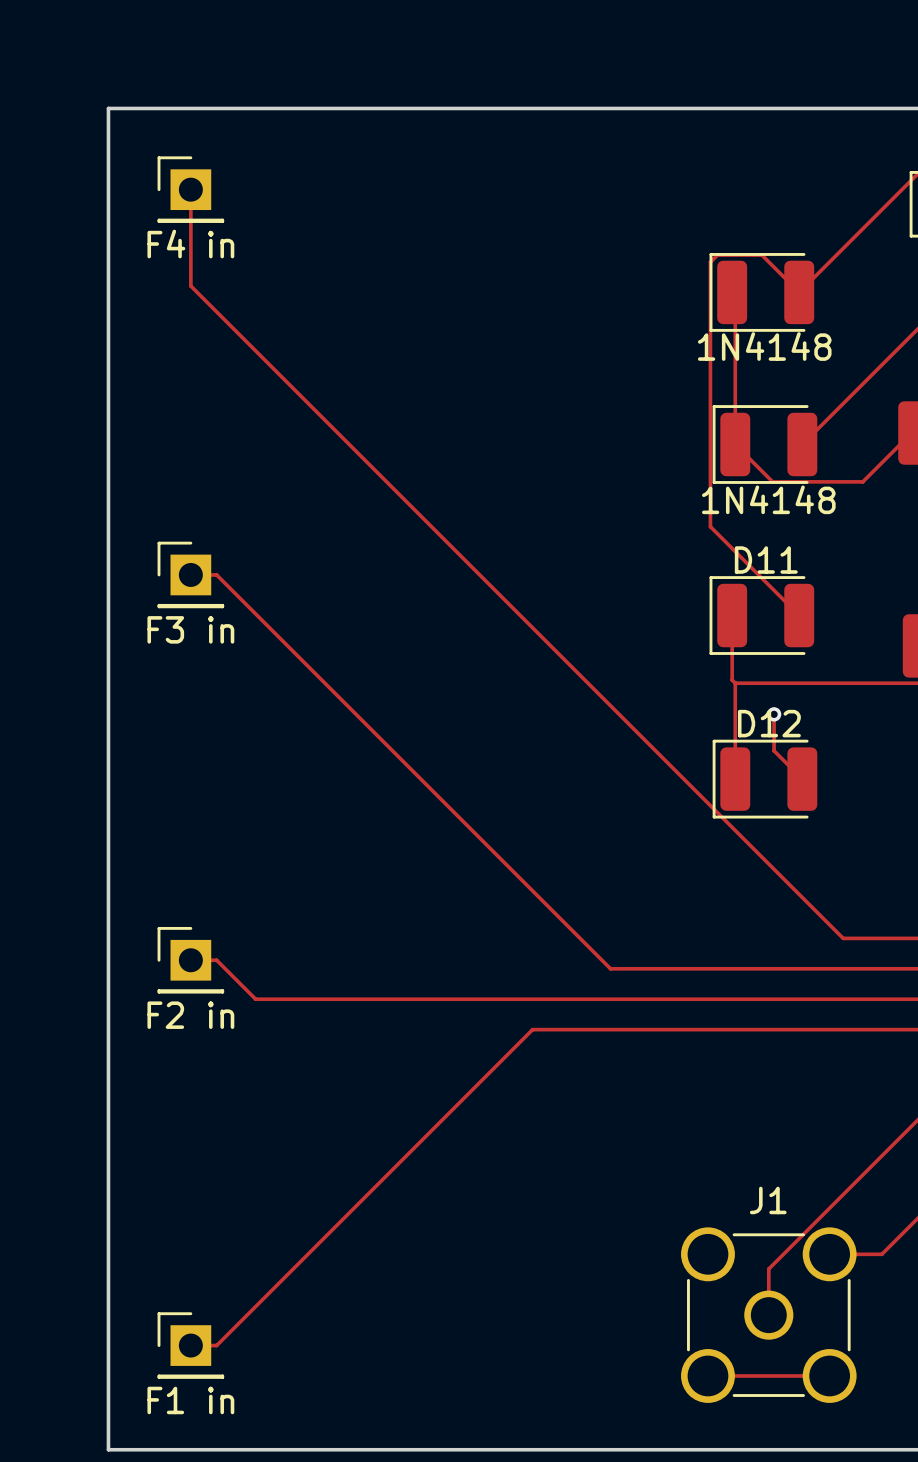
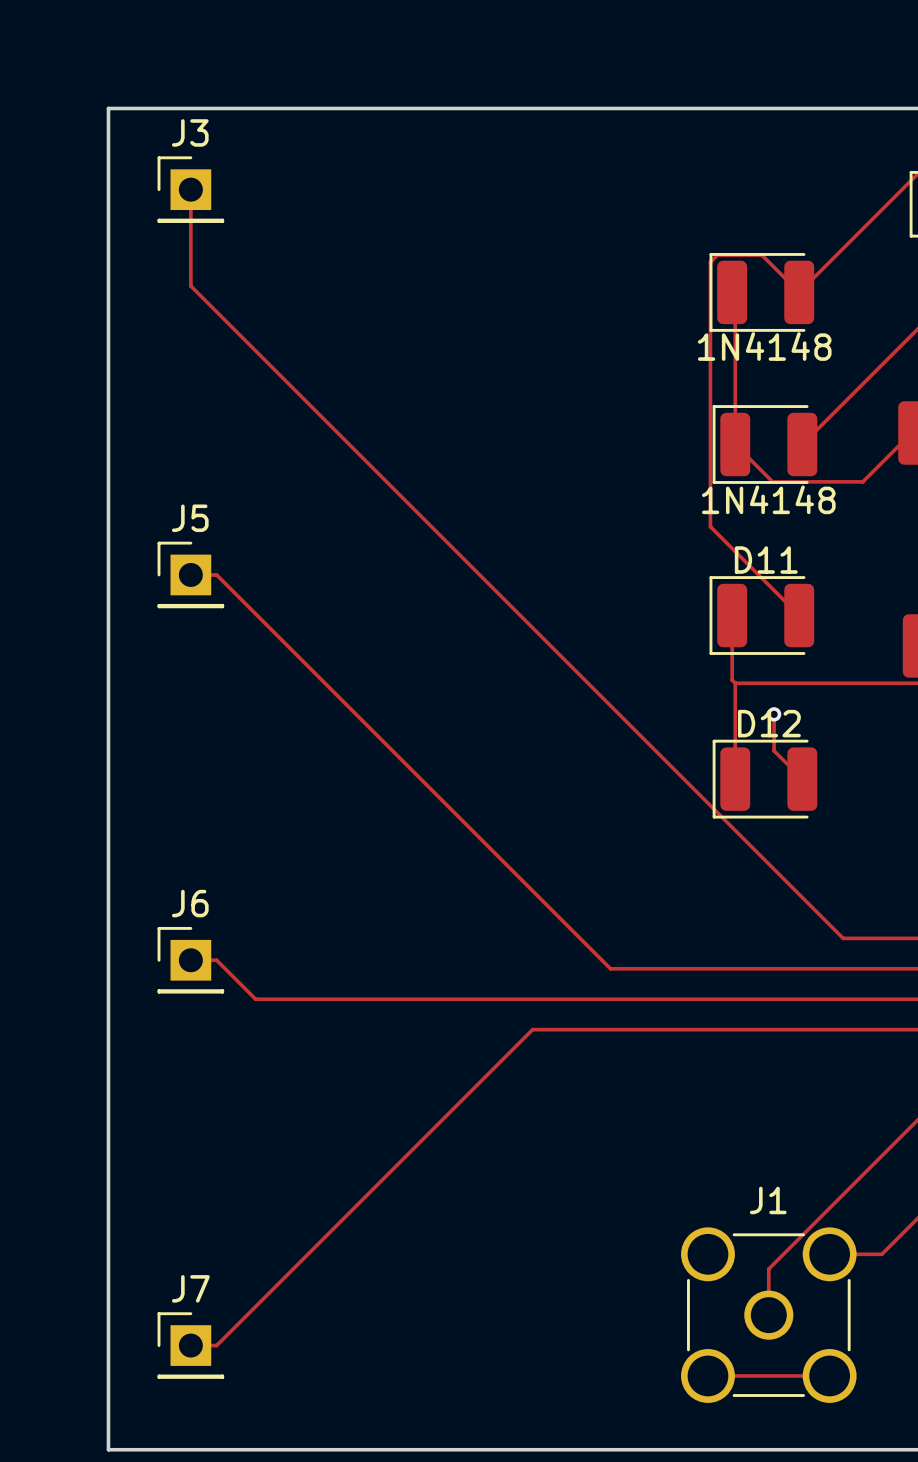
J3 name: none -> J3 (190, 132)
J3 value: F4 in (190, 244) -> none
J5 name: none -> J5 (190, 518)
J5 value: F3 in (190, 629) -> none
J6 name: none -> J6 (190, 903)
J6 value: F2 in (190, 1015) -> none
J7 name: none -> J7 (190, 1288)
J7 value: F1 in (190, 1400) -> none

